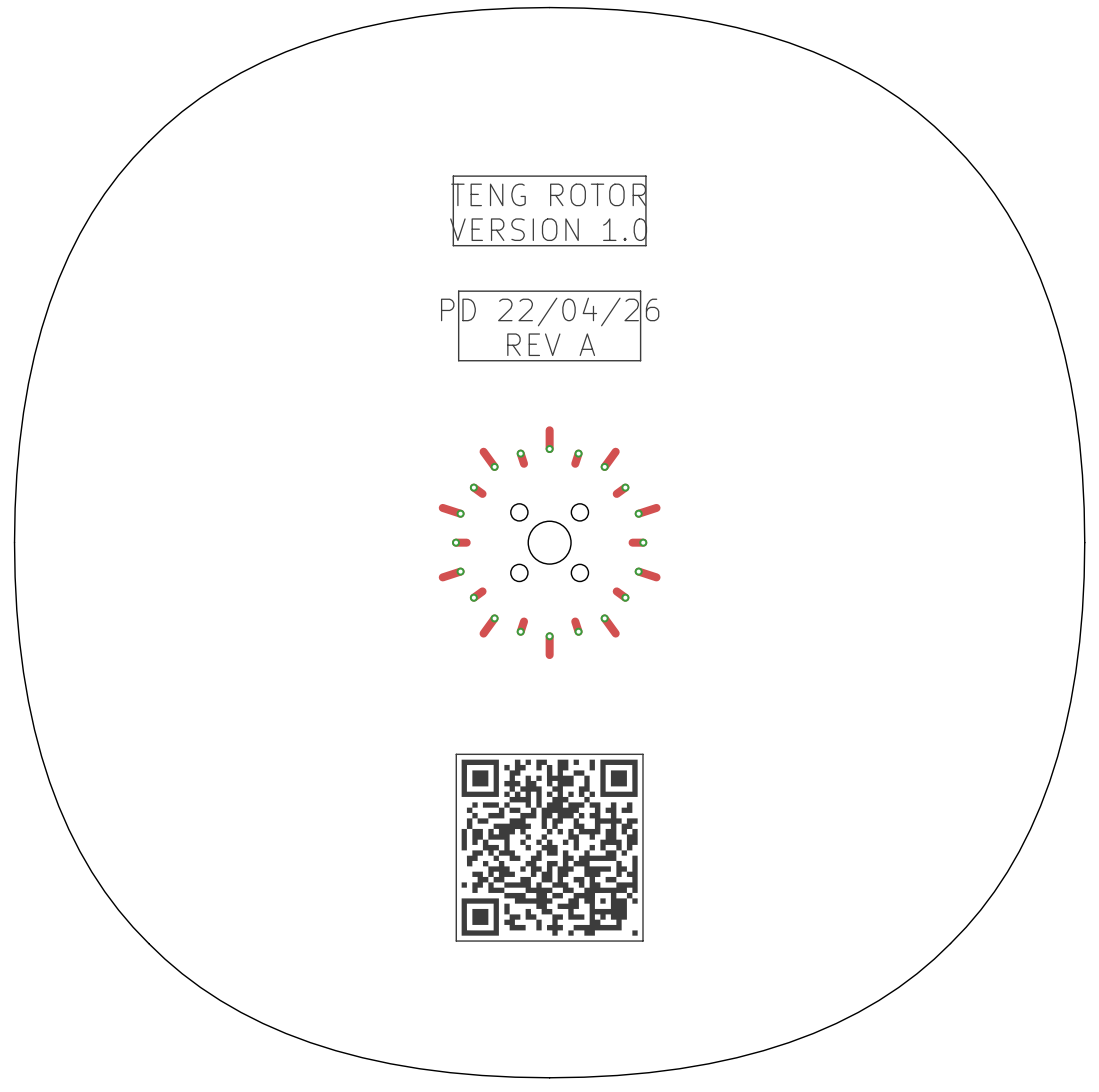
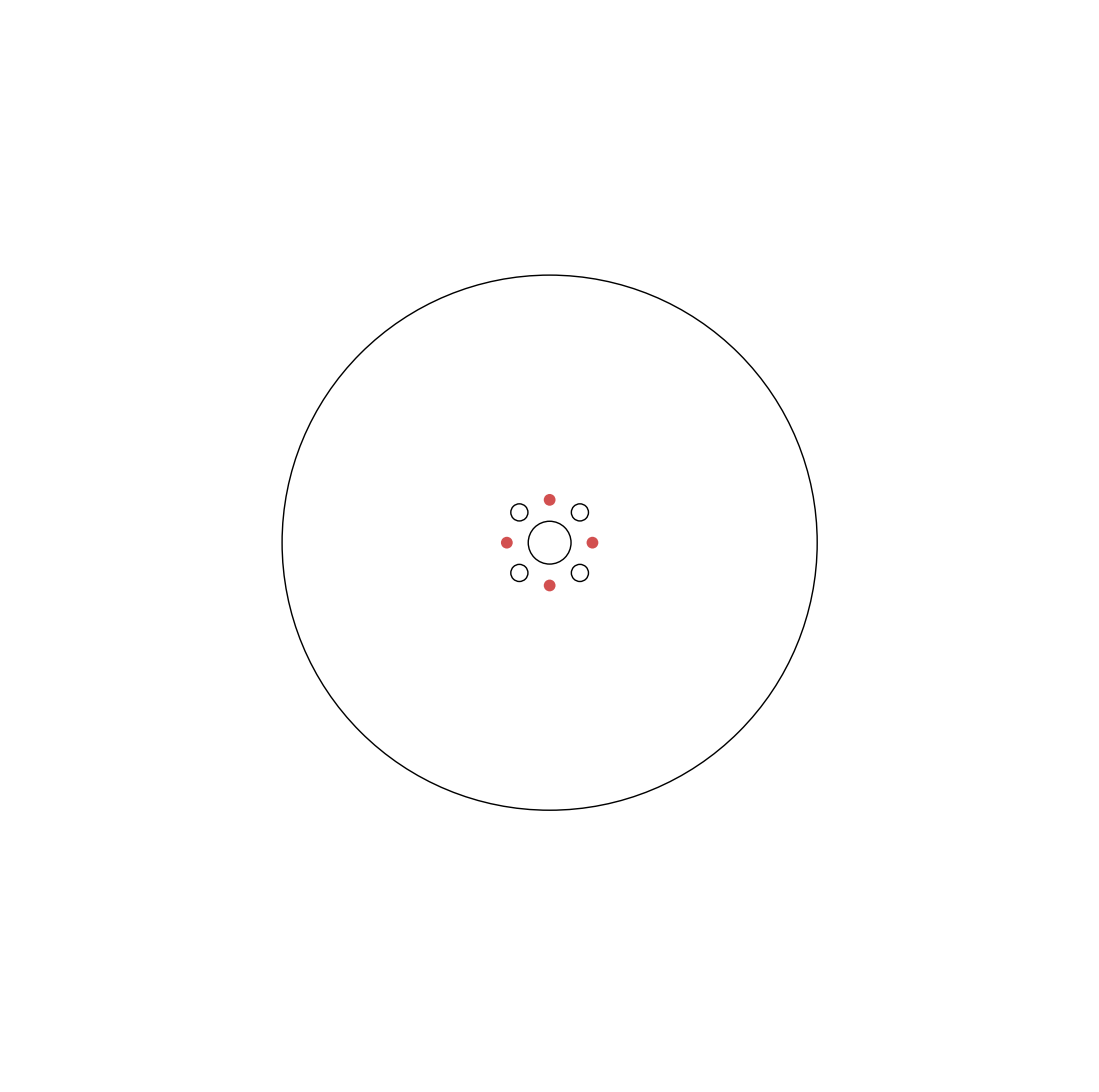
board edge: (549, 7) (482, 9) (419, 16) (362, 27) (310, 42) (262, 61) (220, 84) (182, 111) (148, 141) (118, 175) (91, 213) (68, 255) (49, 303) (34, 355) (23, 412) (16, 475) (14, 542) (16, 610) (23, 672) (34, 729) (49, 782) (68, 829) (91, 872) (118, 910) (148, 943) (182, 973) (220, 1000) (262, 1023) (310, 1042) (362, 1057) (419, 1068) (482, 1075) (549, 1077) (617, 1075) (679, 1068) (736, 1057) (789, 1042) (836, 1023) (879, 1000) (917, 973) (950, 943) (980, 910) (1007, 872) (1030, 829) (1049, 782) (1064, 729) (1075, 672) (1082, 610) (1084, 542) (1082, 475) (1075, 412) (1064, 355) (1049, 303) (1030, 255) (1007, 213) (980, 175) (950, 141) (917, 111) (879, 84) (836, 61) (789, 42) (736, 27) (679, 16) (617, 9) (549, 7) -> none
line: (453, 176) (645, 176) (645, 245) (453, 245) (453, 176) -> none
text: TENG ROTOR (548, 194) -> none
text: VERSION 1.0 (548, 229) -> none
round board edge: none -> [281, 274, 818, 811]
line: (458, 291) (640, 291) (640, 360) (458, 360) (458, 291) -> none
text: PD 22/04/26 (550, 311) -> none
text: REV A (551, 344) -> none
track: (549, 430) (549, 449) -> none
via: (549, 449) -> none
track: (483, 451) (494, 466) -> none
track: (615, 451) (604, 466) -> none
track: (520, 453) (524, 463) -> none
via: (520, 453) -> none
track: (578, 453) (575, 463) -> none
via: (578, 453) -> none
via: (494, 466) -> none
via: (604, 466) -> none
track: (473, 487) (482, 493) -> none
via: (473, 487) -> none
track: (625, 487) (616, 493) -> none
via: (625, 487) -> none
part: none -> (549, 499)
track: (442, 507) (460, 513) -> none
track: (656, 507) (638, 513) -> none
via: (460, 513) -> none
via: (638, 513) -> none
track: (456, 542) (466, 542) -> none
via: (456, 542) -> none
part: none -> (506, 542)
part: none -> (592, 542)
track: (632, 542) (643, 542) -> none
via: (643, 542) -> none
track: (460, 571) (442, 577) -> none
via: (460, 571) -> none
track: (638, 571) (656, 577) -> none
via: (638, 571) -> none
part: none -> (549, 585)
track: (482, 591) (473, 597) -> none
track: (616, 591) (625, 597) -> none
via: (473, 597) -> none
via: (625, 597) -> none
track: (494, 618) (483, 633) -> none
via: (494, 618) -> none
track: (604, 618) (615, 633) -> none
via: (604, 618) -> none
track: (524, 621) (520, 631) -> none
track: (575, 621) (578, 631) -> none
via: (520, 631) -> none
via: (578, 631) -> none
track: (549, 636) (549, 655) -> none
via: (549, 636) -> none
line: (456, 754) (642, 754) (642, 941) (456, 941) (456, 754) -> none
drawing: [461, 759, 638, 936] -> none

